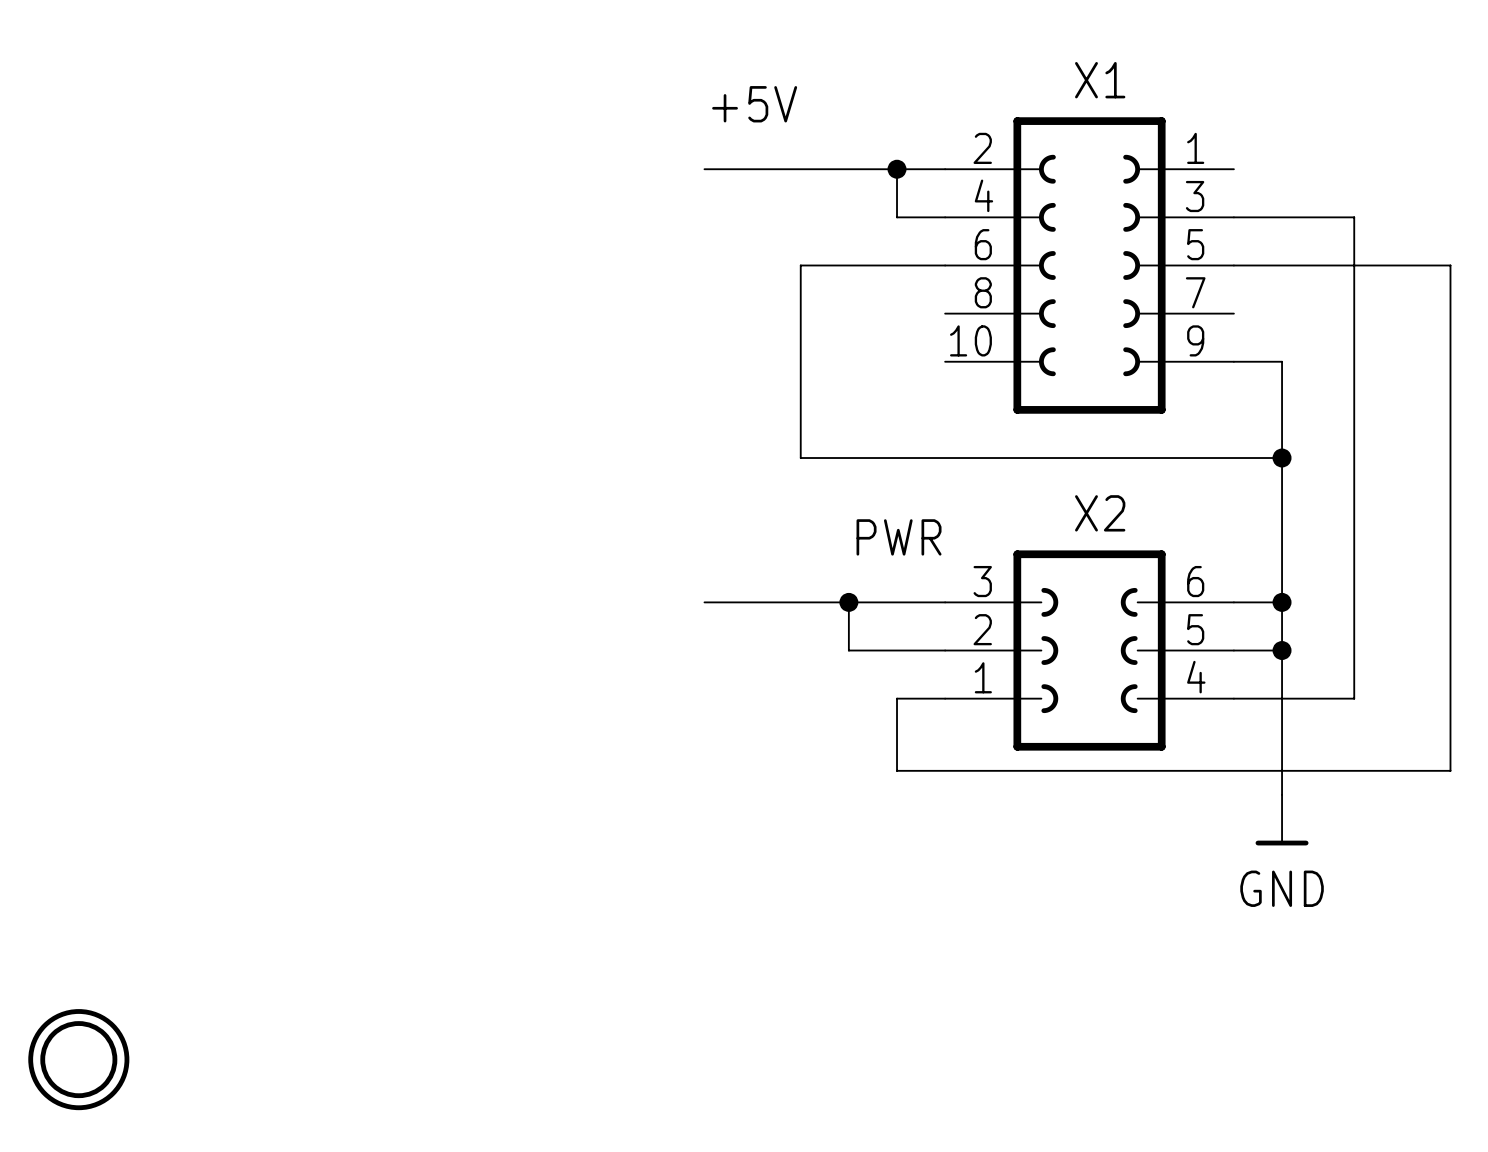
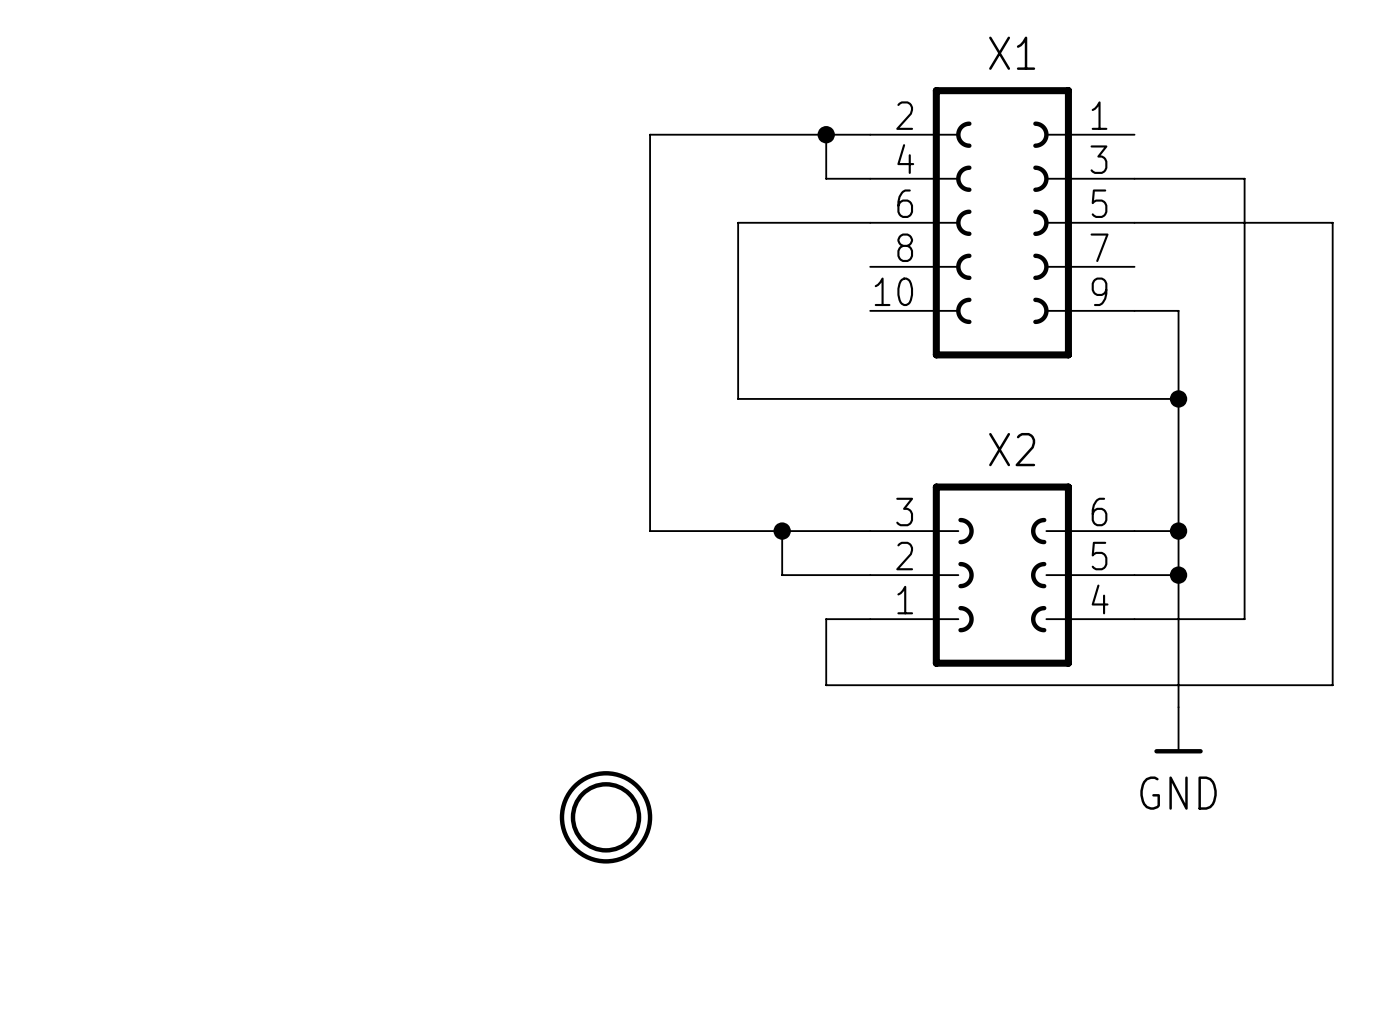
label: +5V (754, 104) -> none
wire: none -> (650, 134) (650, 531)
label: PWR (899, 537) -> none
part: none -> (606, 817)
part: (78, 1059) -> none

